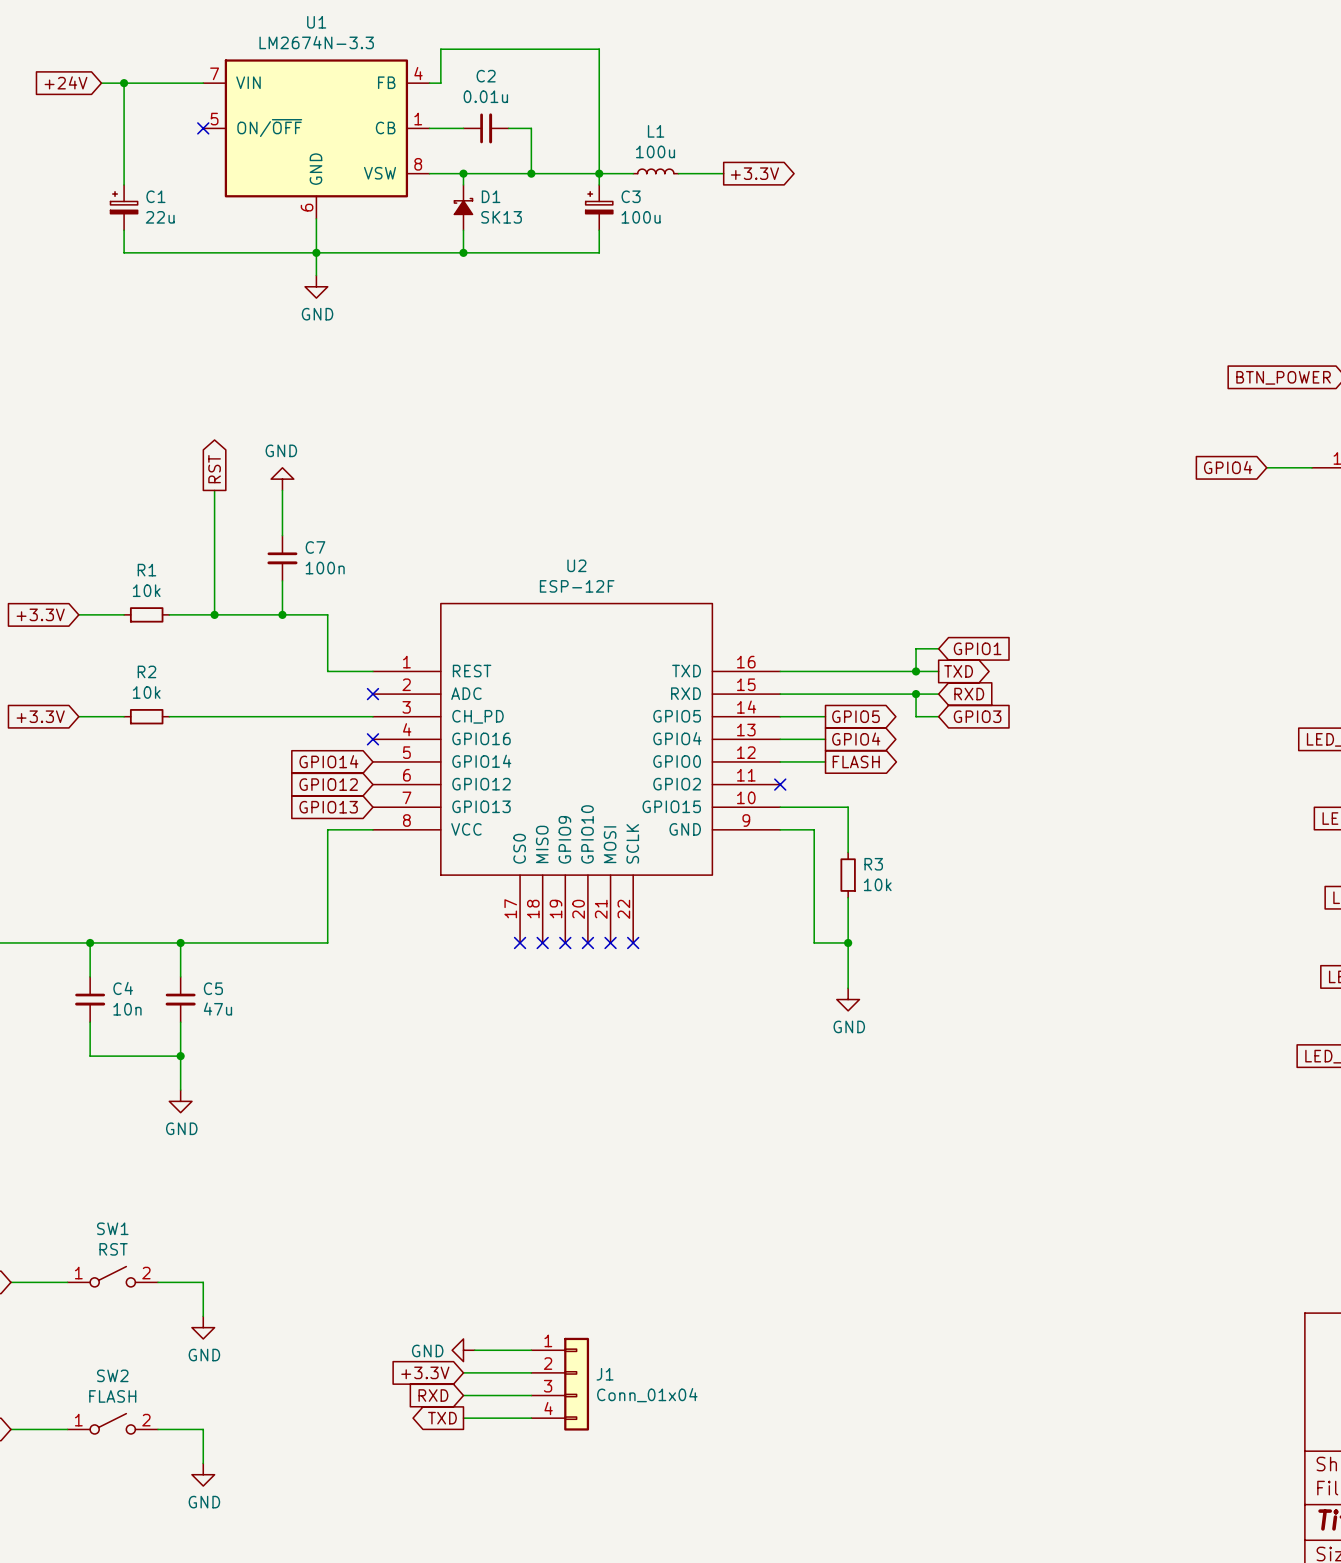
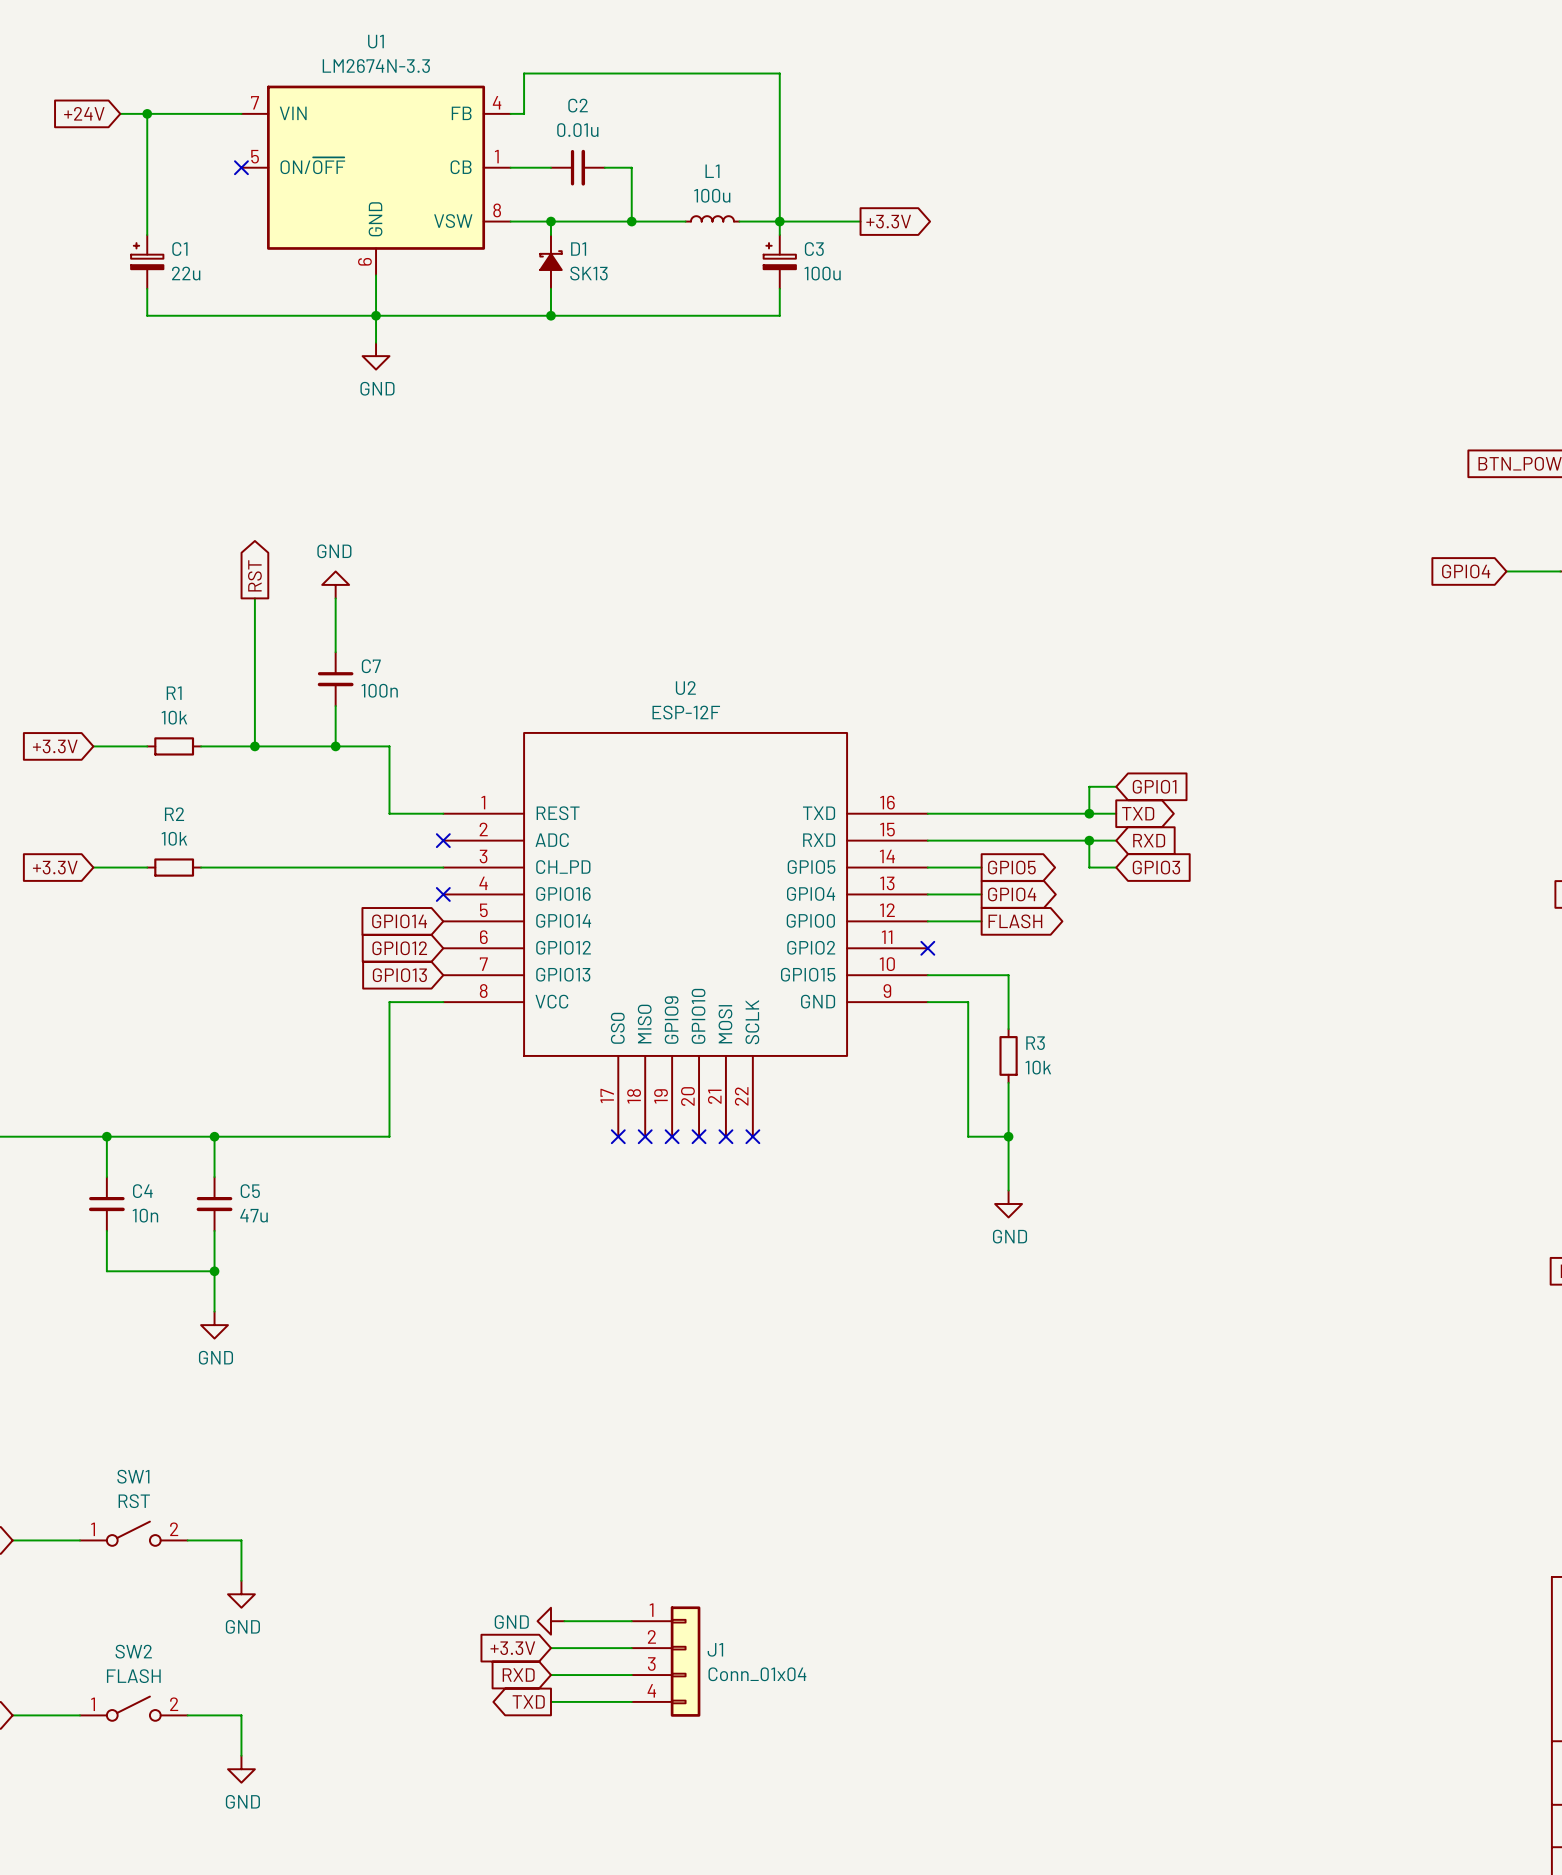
wire: (599, 49) (599, 184) -> (712, 73) (779, 73) (779, 235)
L1 position: (655, 171) -> (712, 218)
wire: (576, 173) (621, 173) -> (752, 221) (806, 221)
junction: (599, 173) -> none
junction: none -> (779, 221)
C3 position: (599, 207) -> (779, 261)
wire: (599, 230) (599, 252) -> (779, 288) (779, 315) (712, 315)

